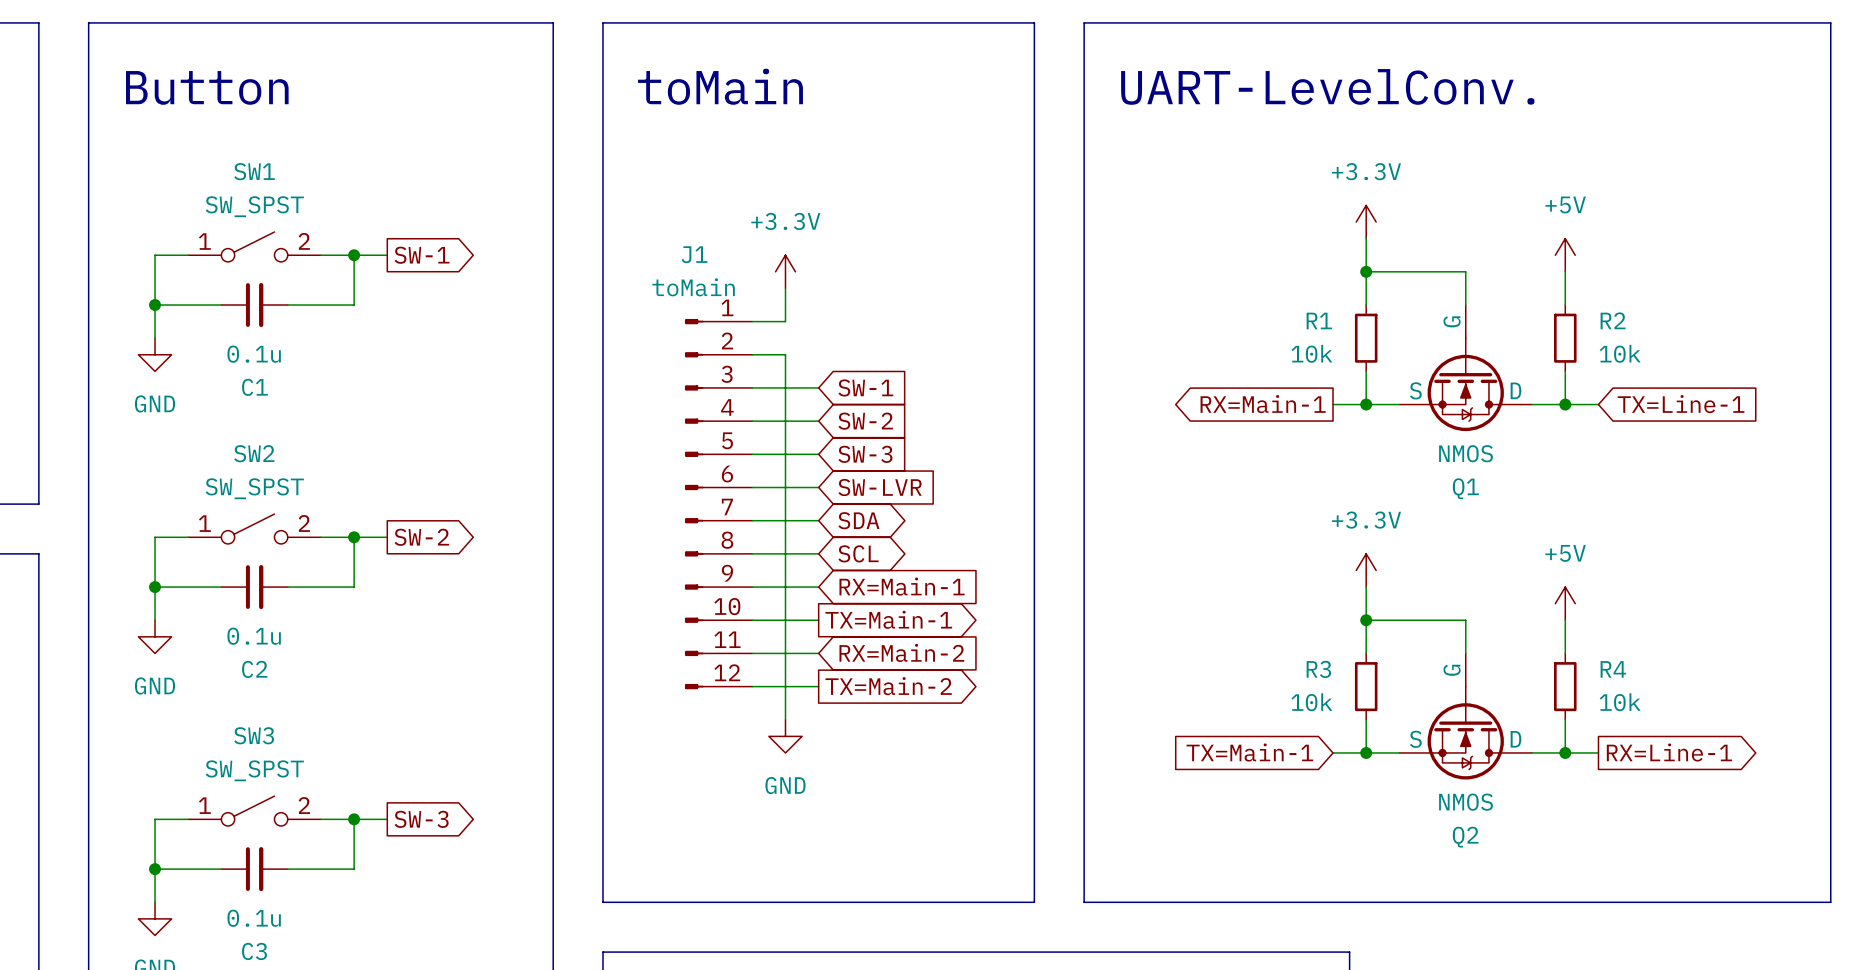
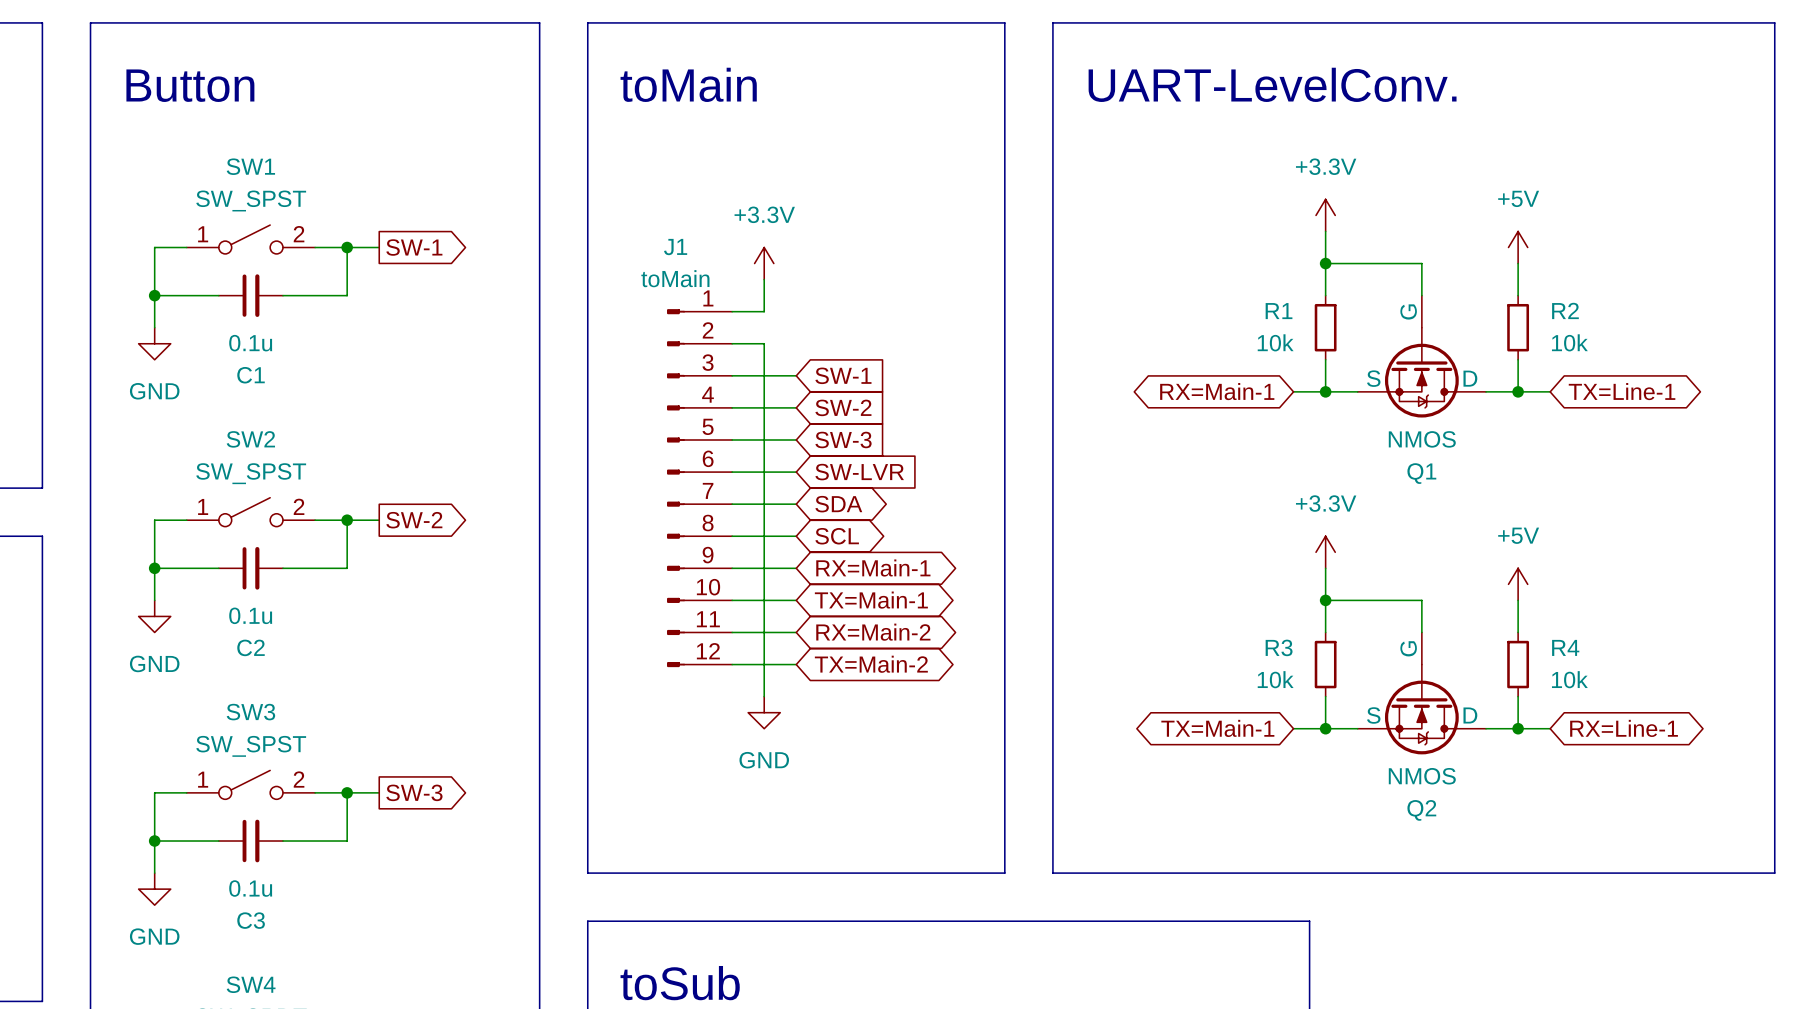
global label shape: output (1263, 404) -> bidirectional (1217, 391)
global label shape: input (1681, 404) -> bidirectional (1622, 391)
global label shape: input (902, 586) -> bidirectional (873, 568)
global label shape: output (888, 619) -> bidirectional (871, 600)
global label shape: input (901, 652) -> bidirectional (873, 632)
global label shape: output (888, 686) -> bidirectional (871, 664)
global label shape: input (1249, 752) -> bidirectional (1217, 728)
global label shape: output (1669, 752) -> bidirectional (1624, 728)

